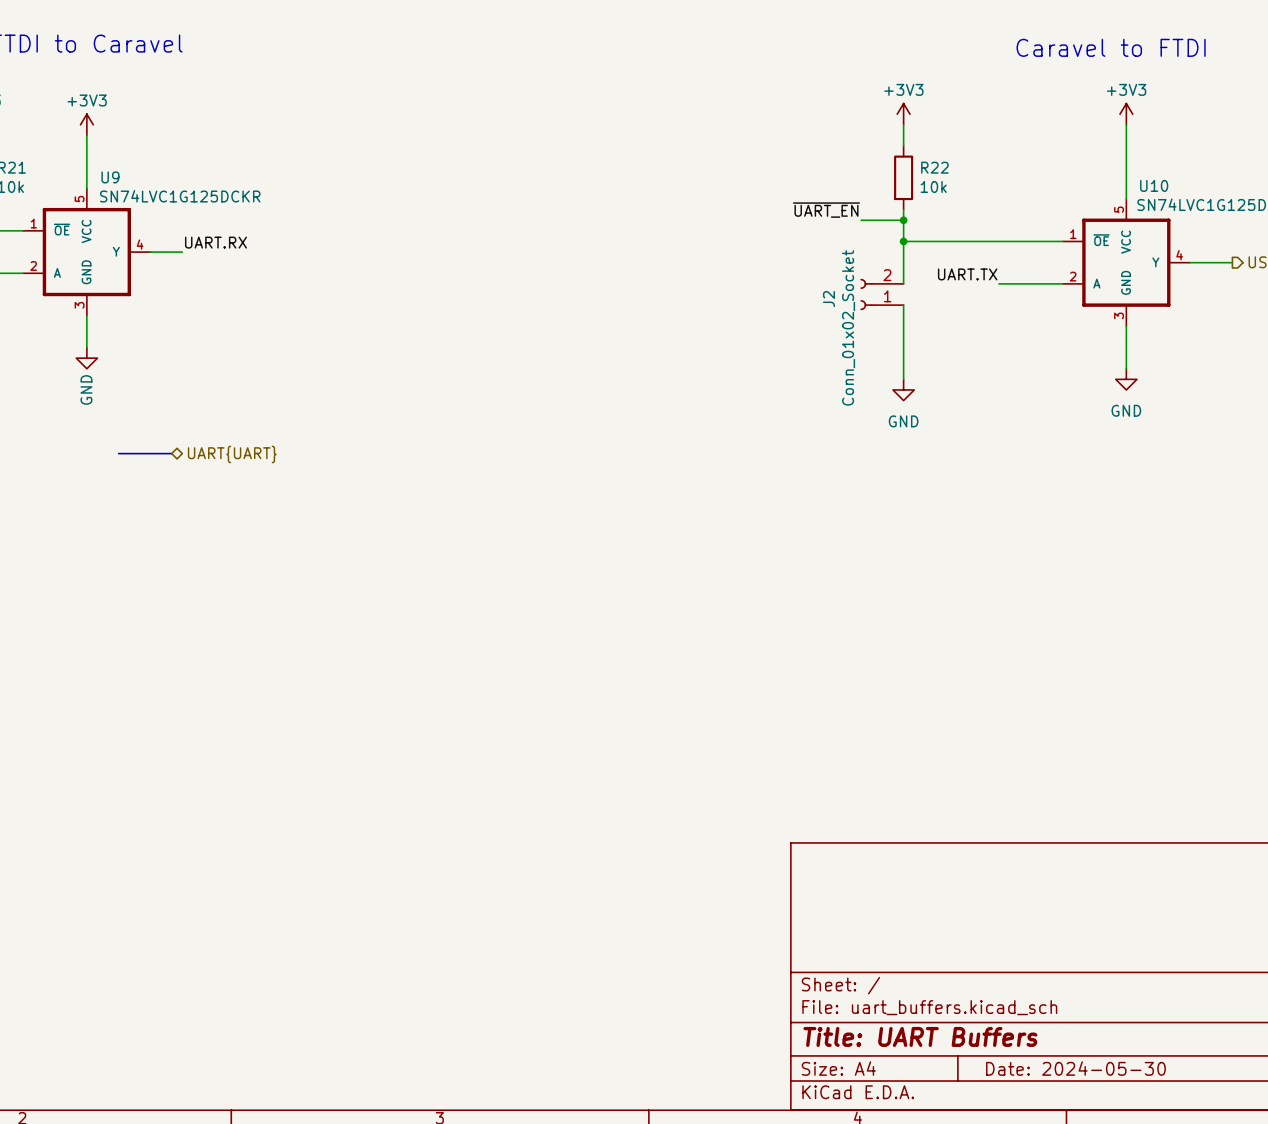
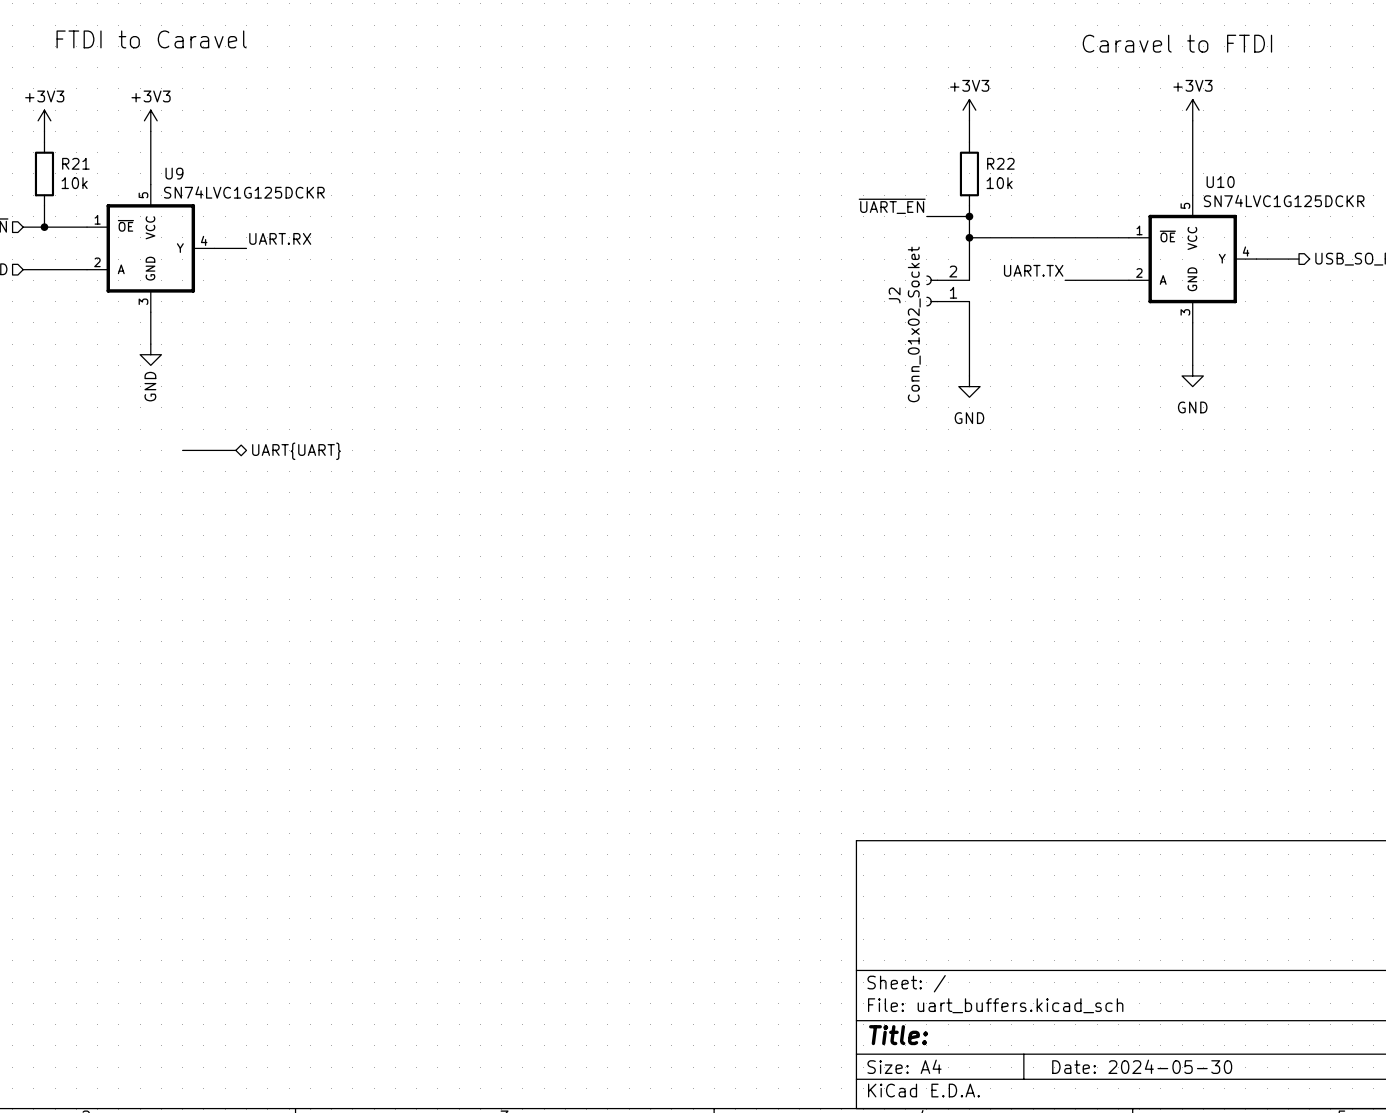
title block: Title: UART Buffers (920, 1036) -> Title: (898, 1035)

